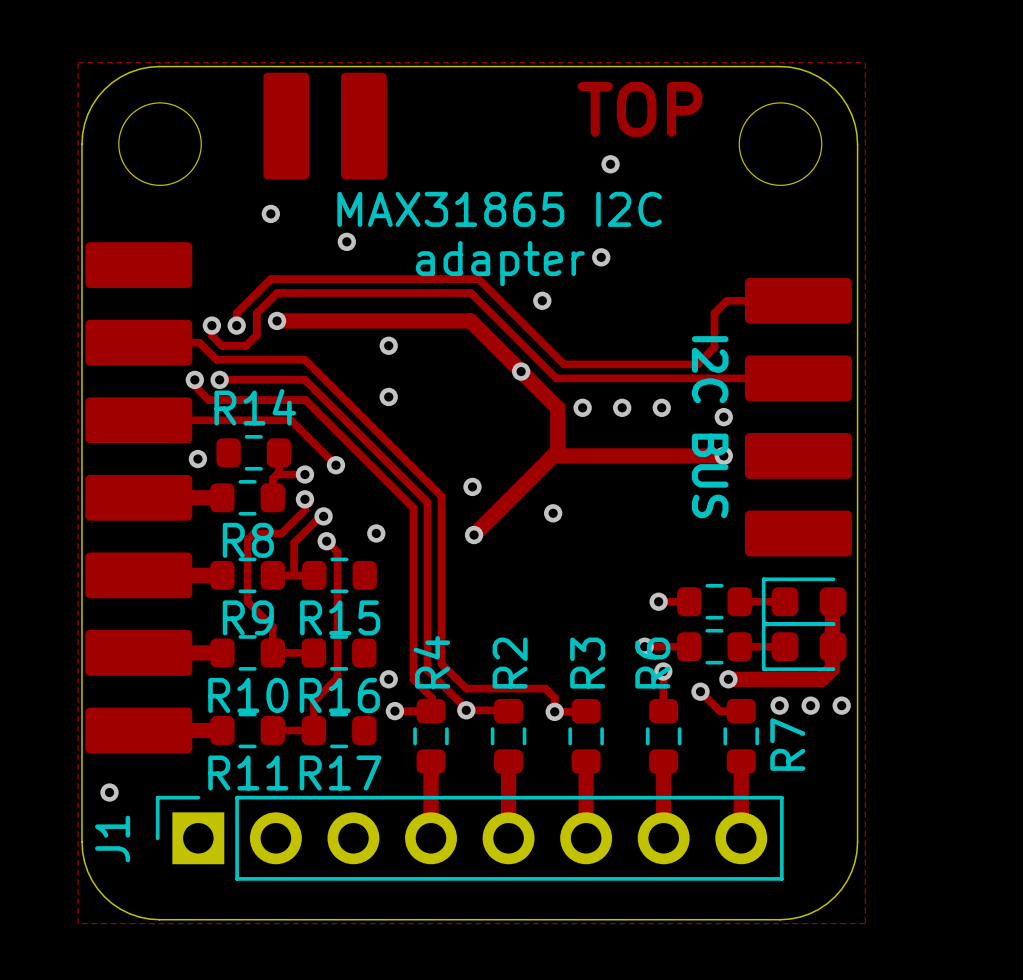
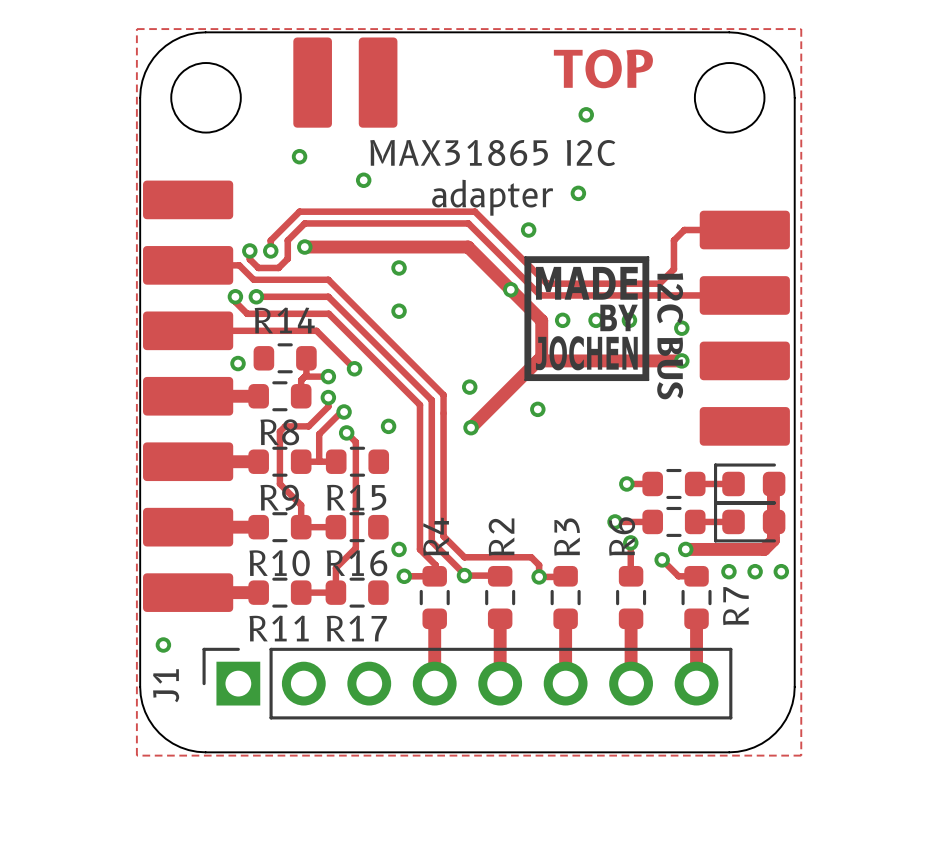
drawing: none -> [524, 256, 649, 381]

